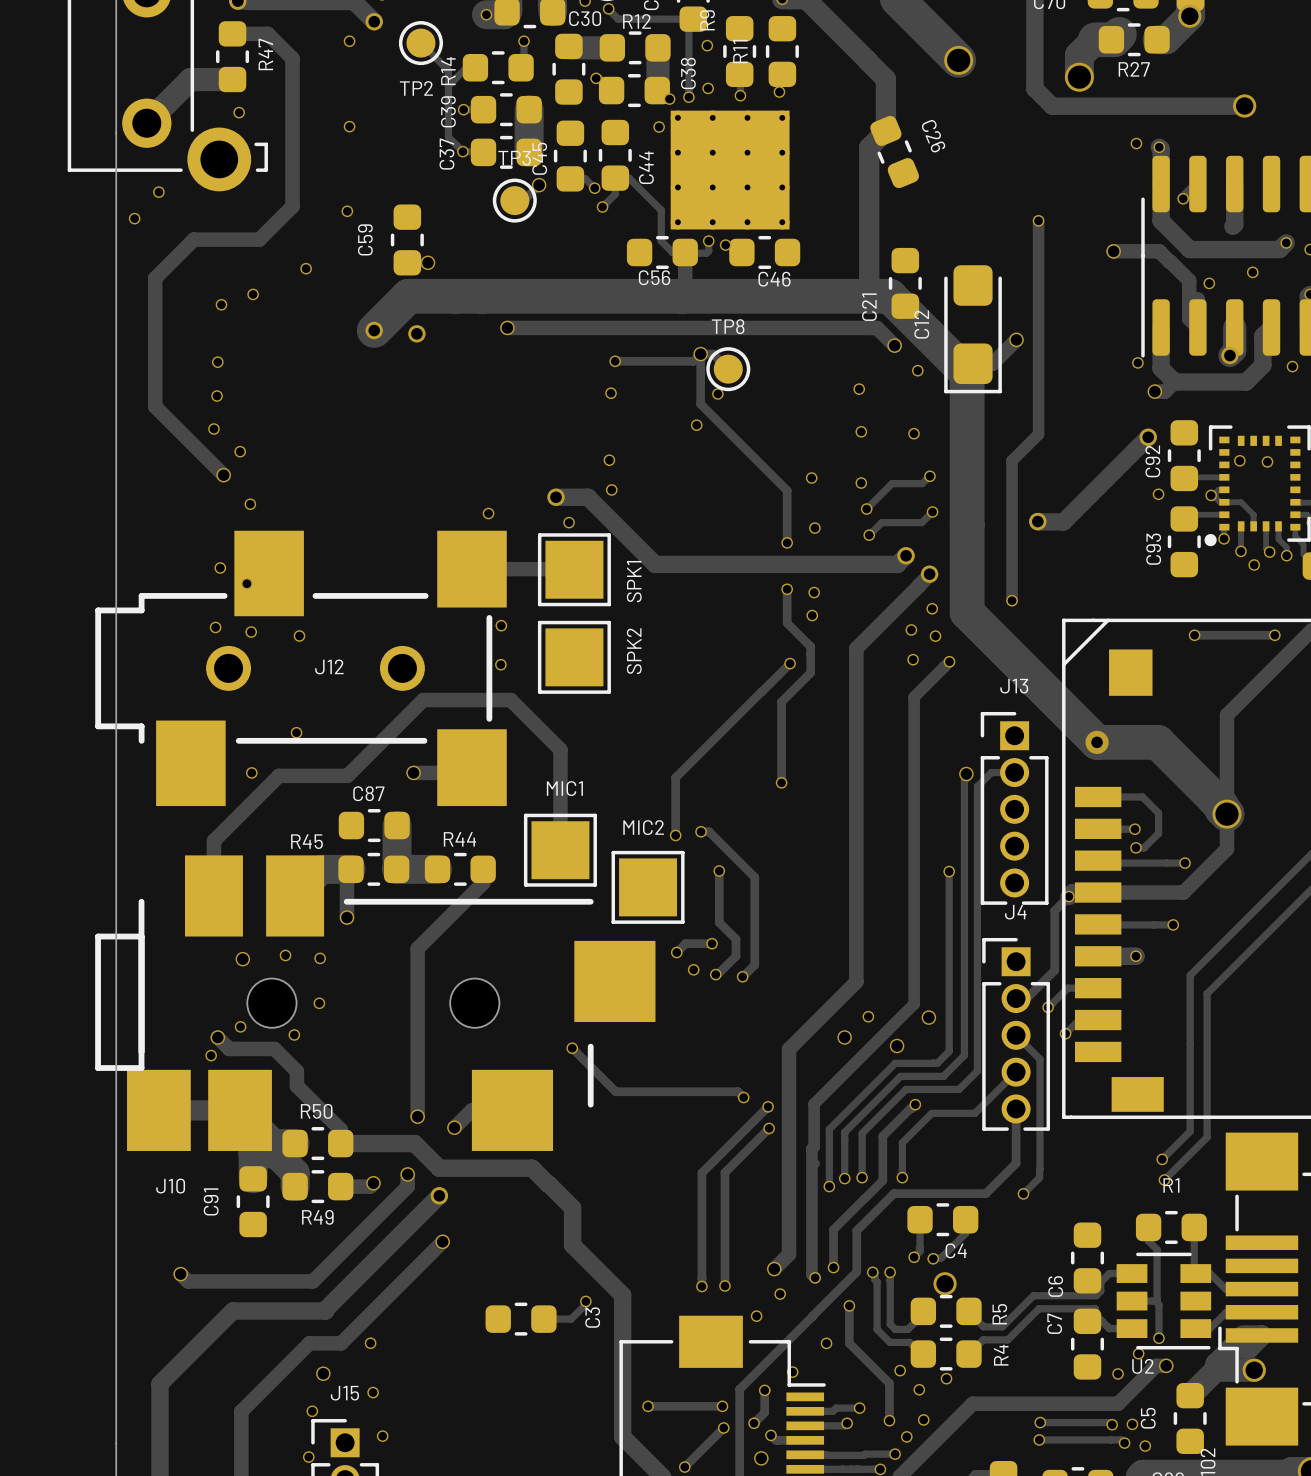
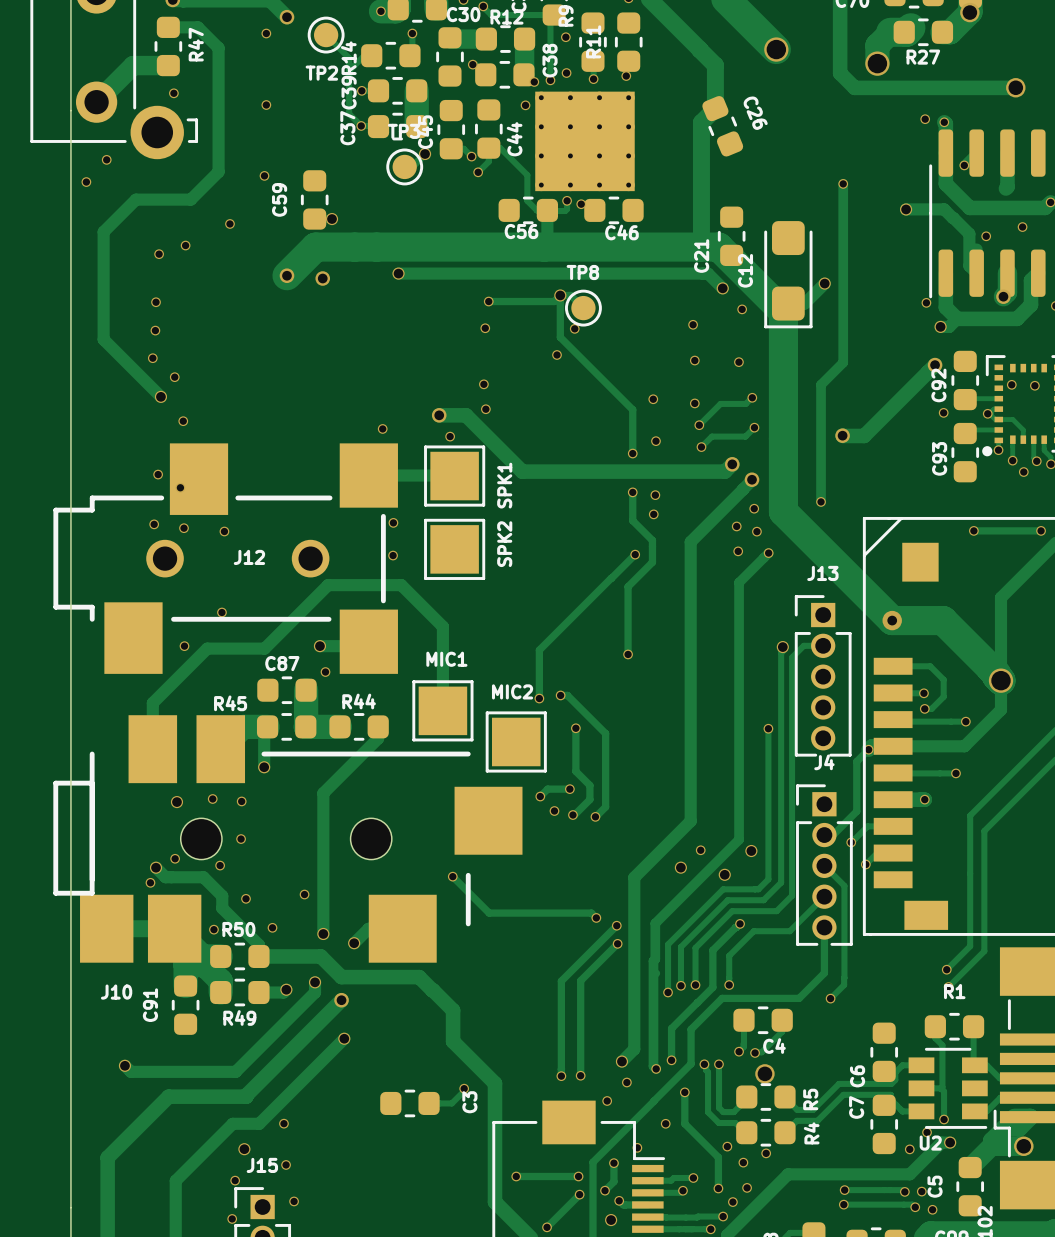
via: none -> (325, 672)
via: none -> (304, 894)
via: none -> (246, 898)
via: none -> (272, 927)
via: none -> (213, 929)

